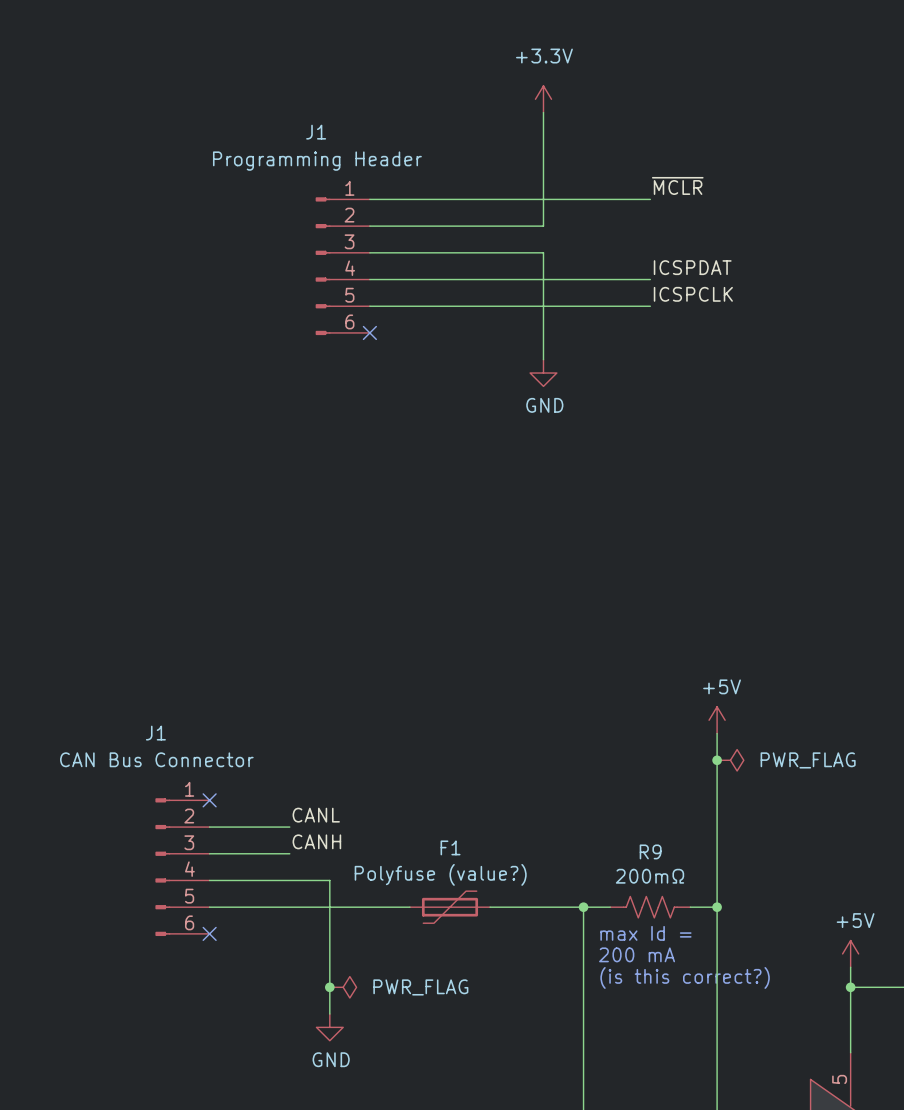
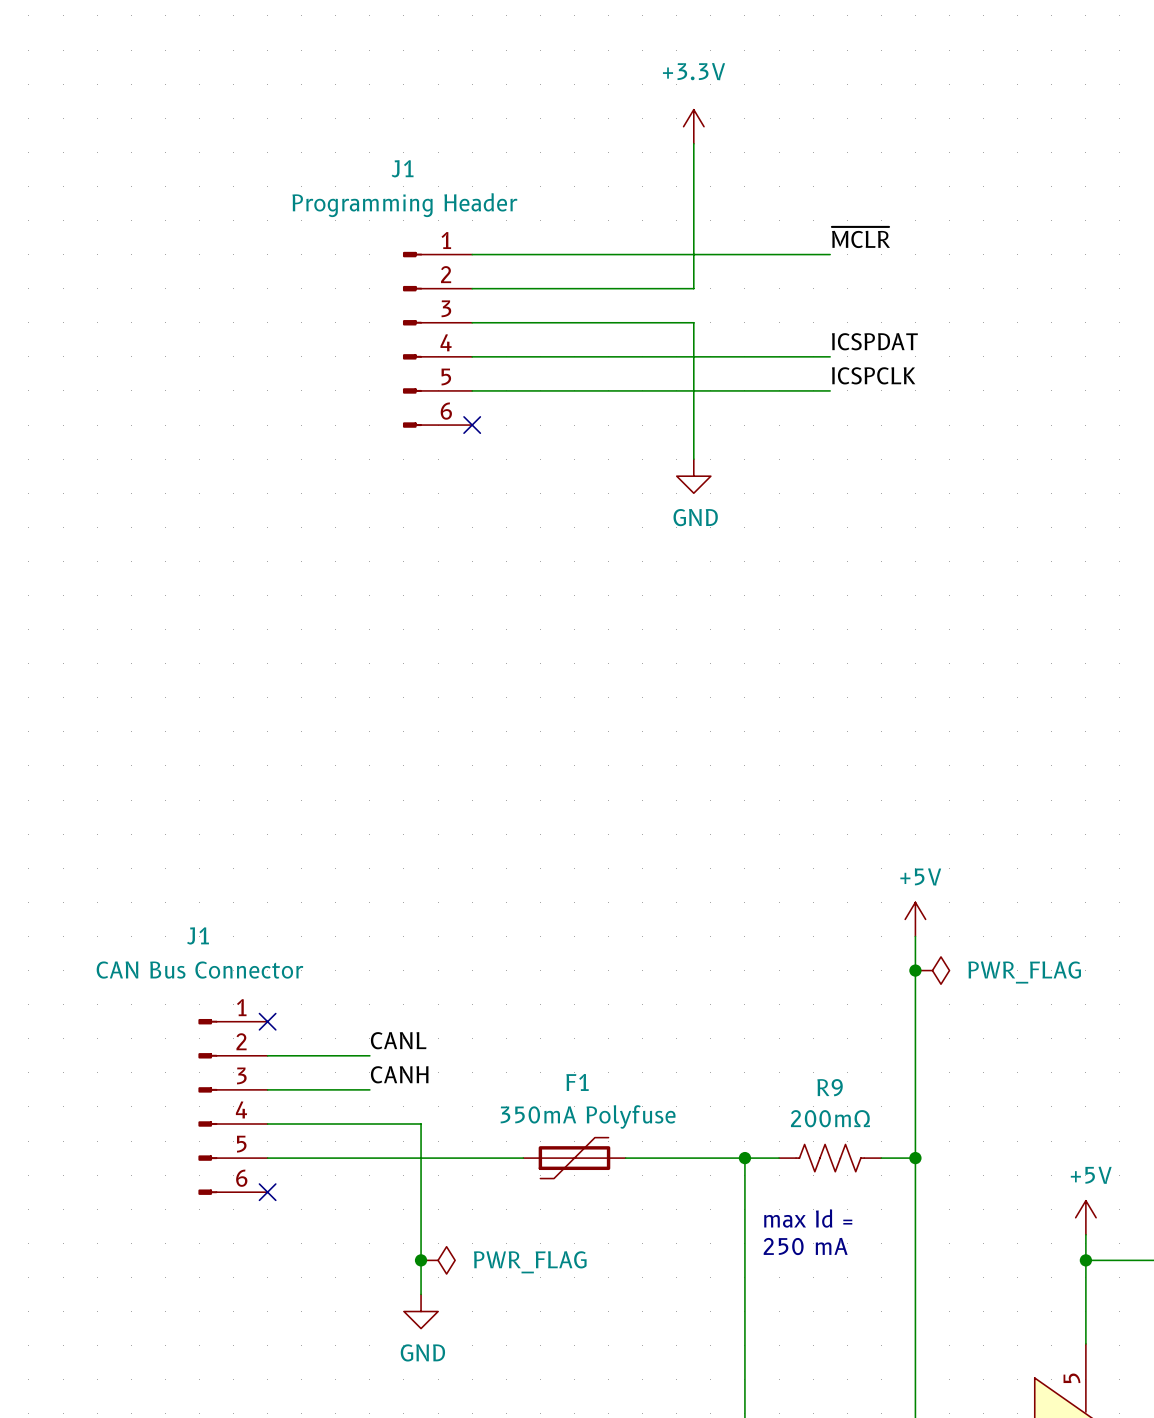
F1 value: Polyfuse (value?) (440, 874) -> 350mA Polyfuse (588, 1116)
text: max Id = (645, 933) -> none
text: 200 mA (637, 954) -> max Id = (808, 1218)
text: (is this correct?) (685, 977) -> 250 mA (805, 1246)

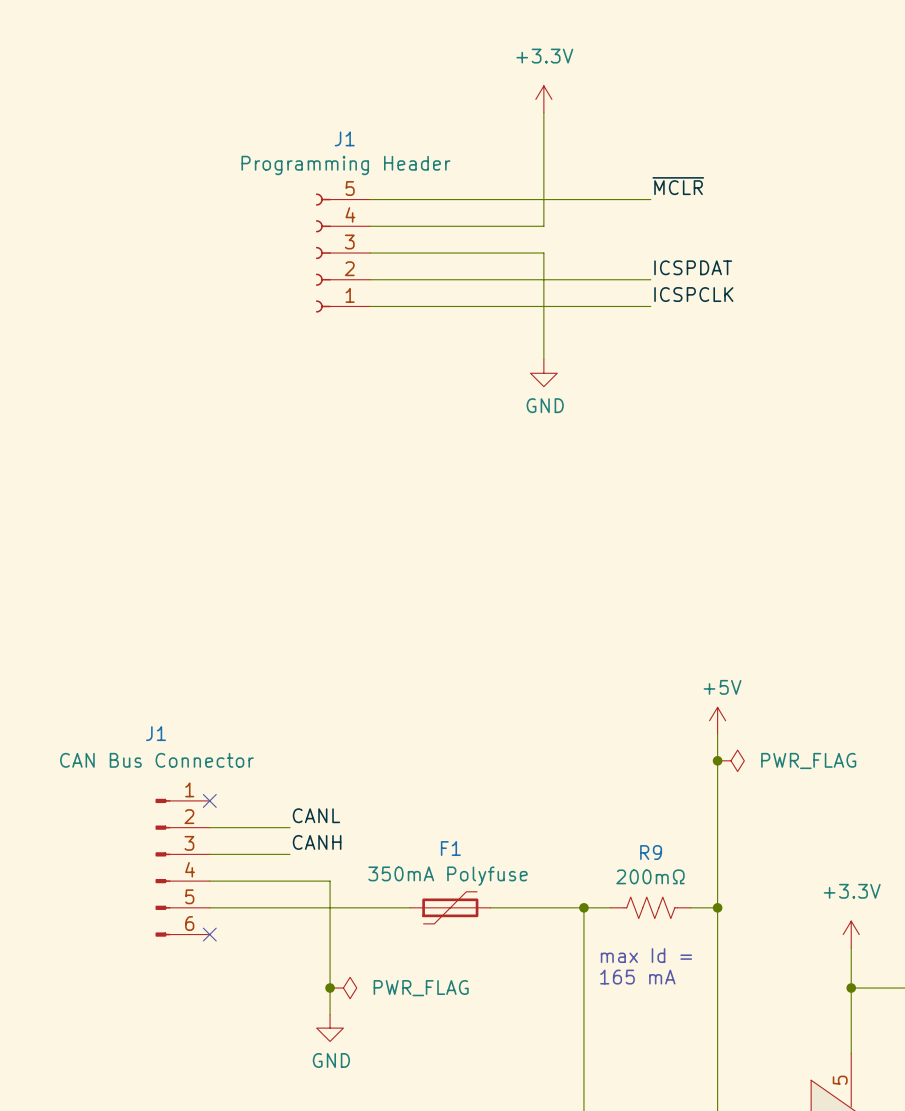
J1: none -> Programming Header (343, 253)
J1: Programming Header (437, 339) -> none
no-connect mark: (472, 425) -> none
power symbol: none -> +3.3V (851, 934)
power symbol: +5V (1085, 1217) -> none
text: 250 mA (805, 1246) -> 165 mA (637, 977)

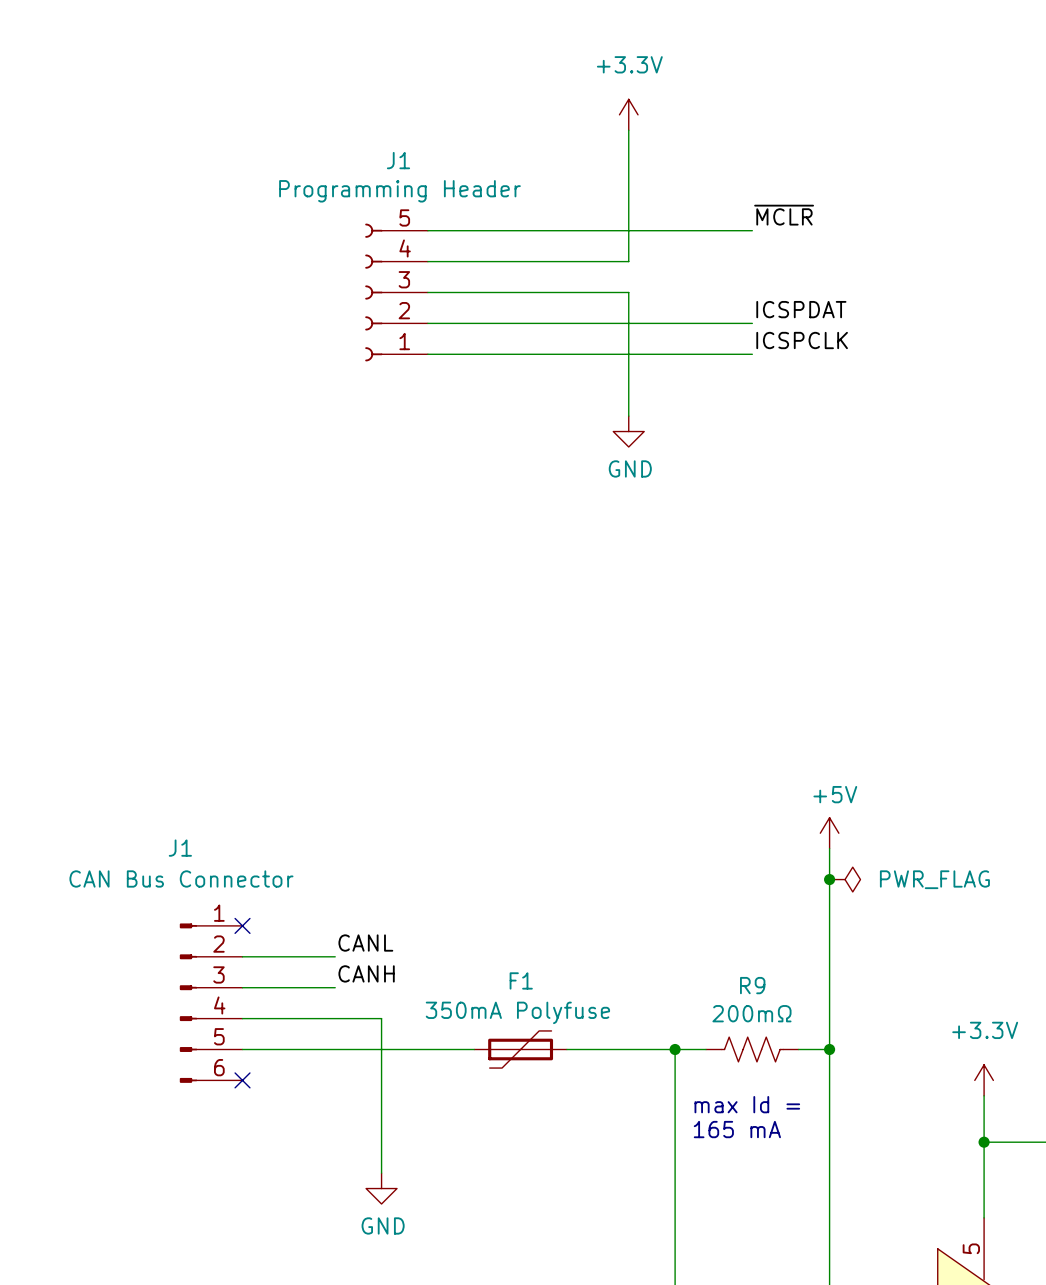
junction: (330, 988) -> none
power symbol: PWR_FLAG (343, 988) -> none

